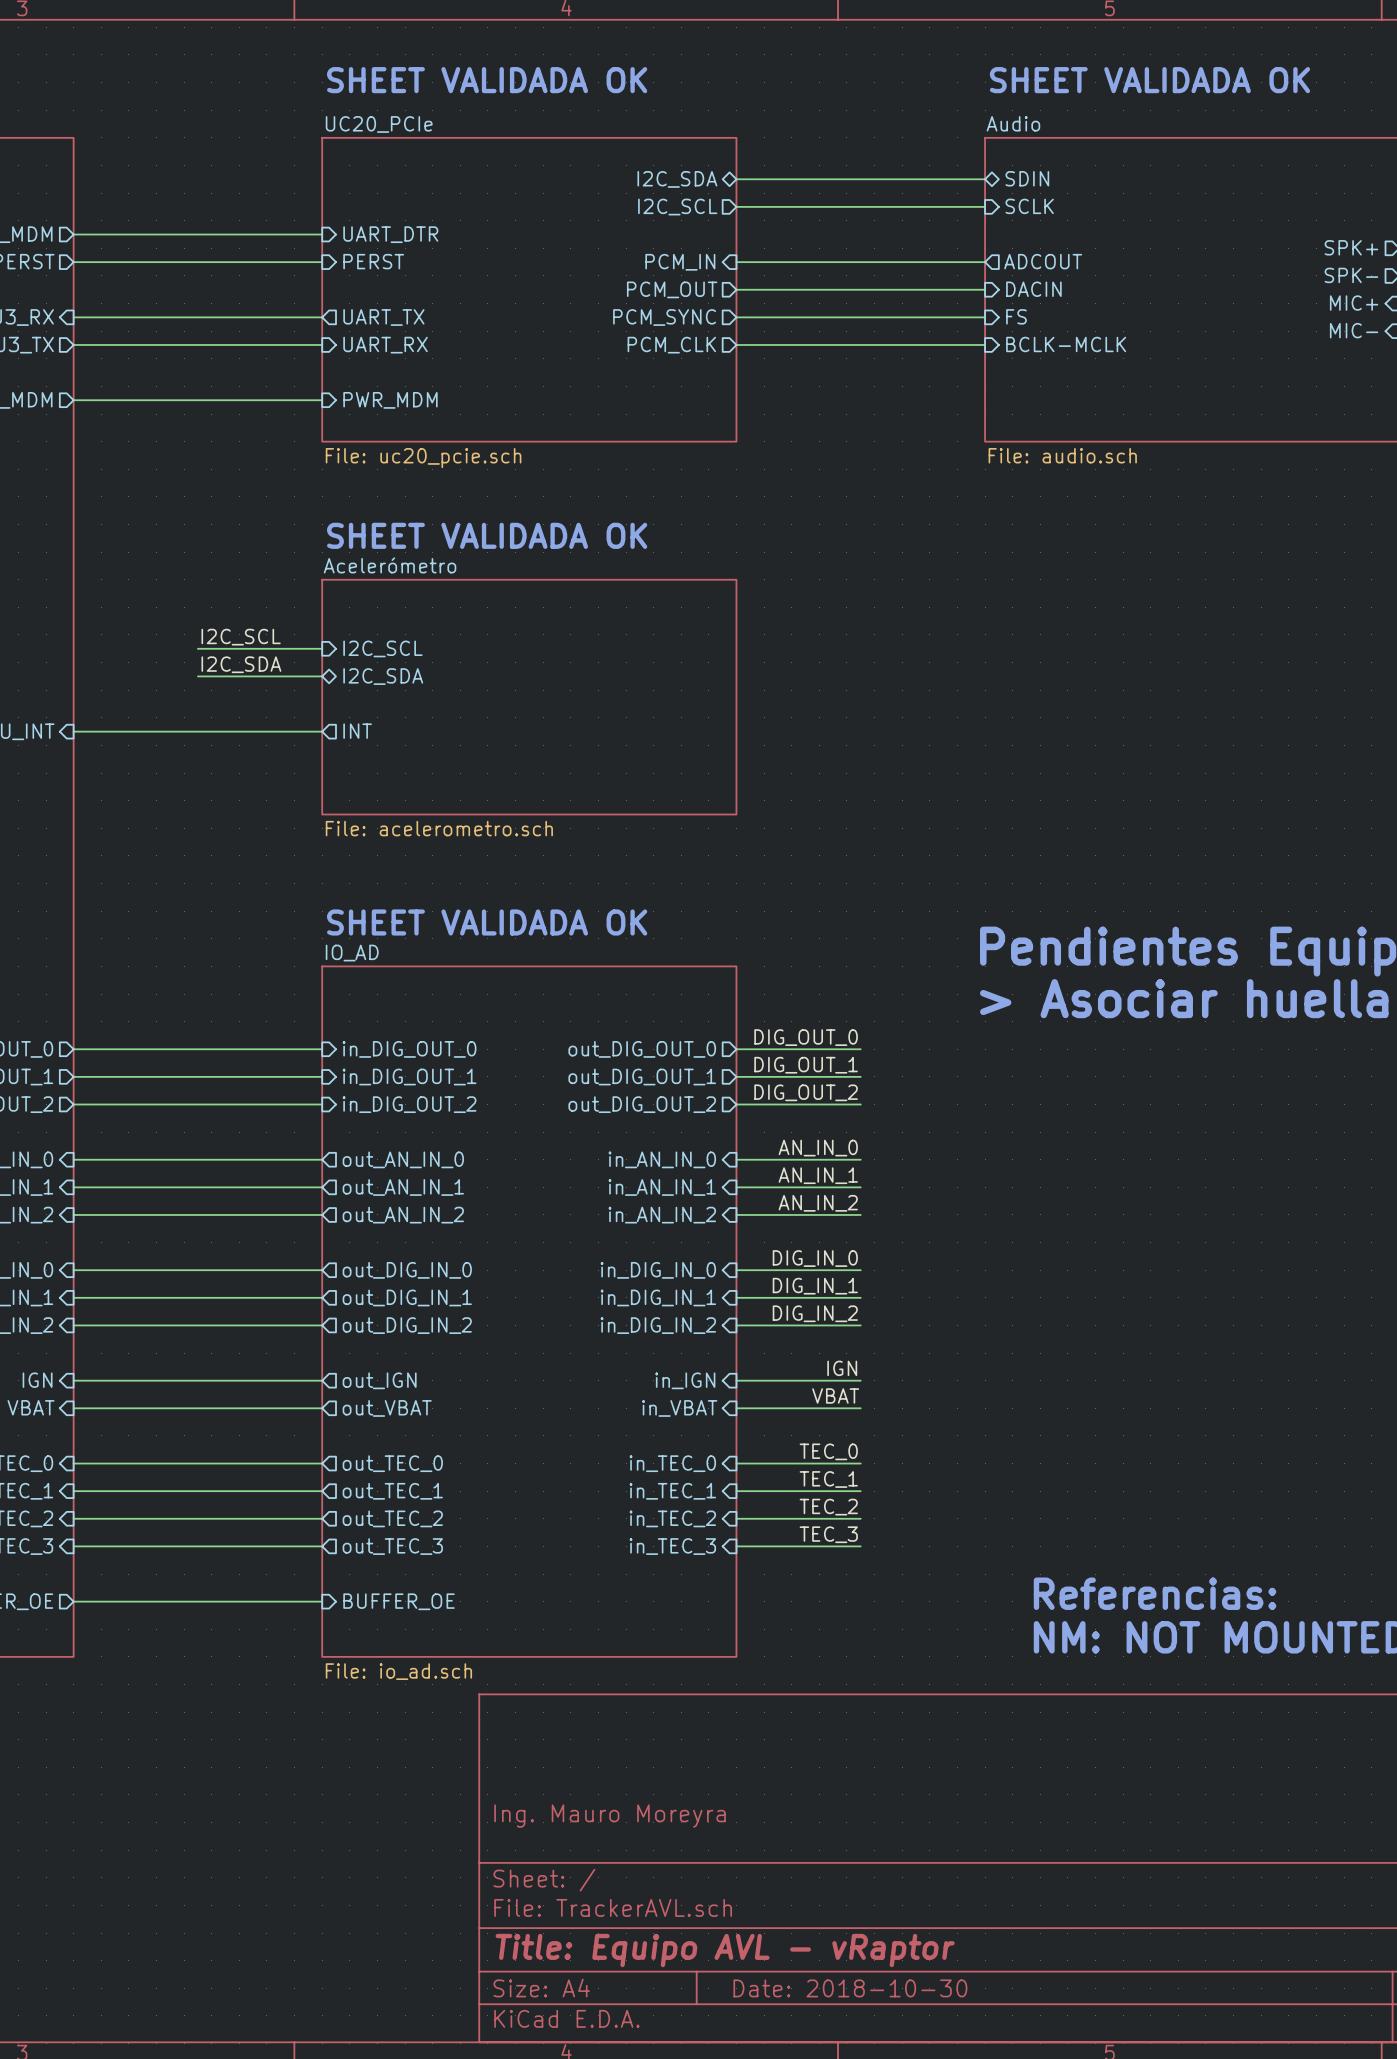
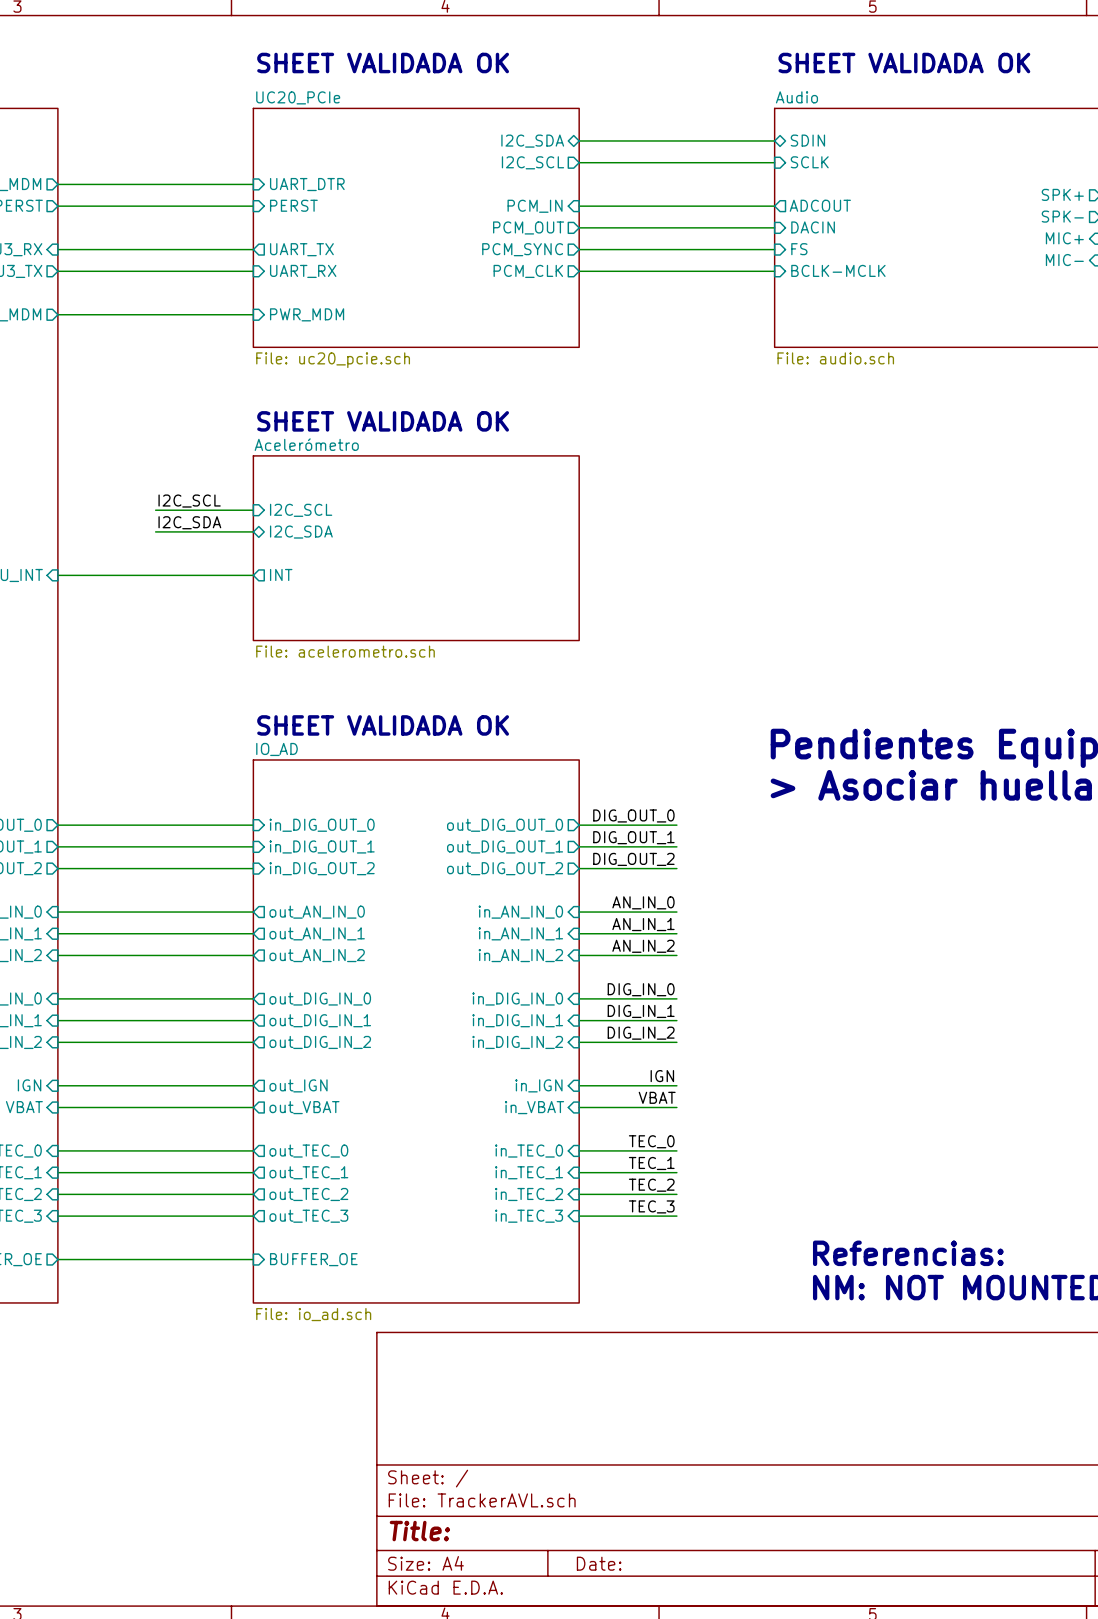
title block: Ing. Mauro Moreyra (610, 1816) -> none
title block: Title: Equipo AVL - vRaptor (725, 1950) -> Title: (419, 1531)
title block: Date: 2018-10-30 (850, 1988) -> Date: (599, 1563)

